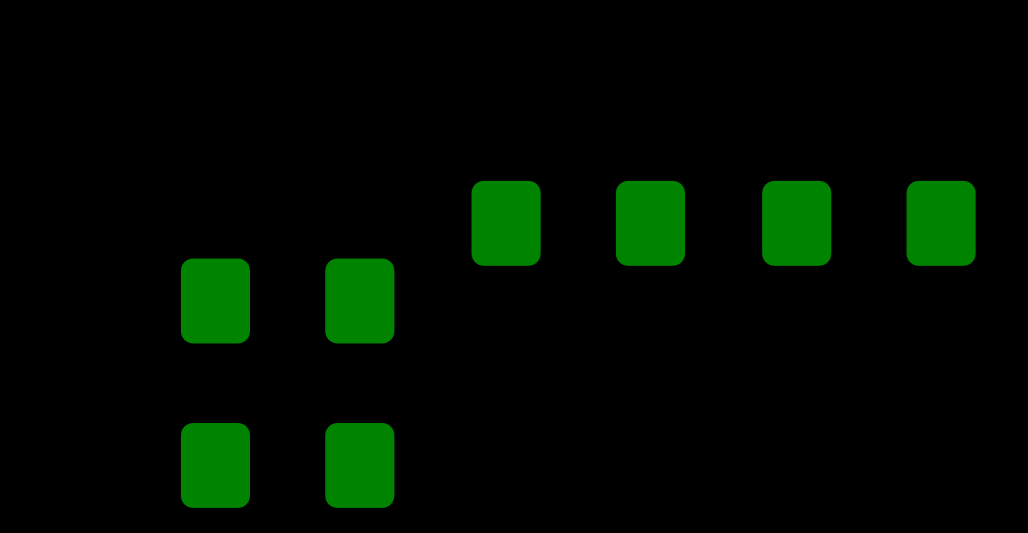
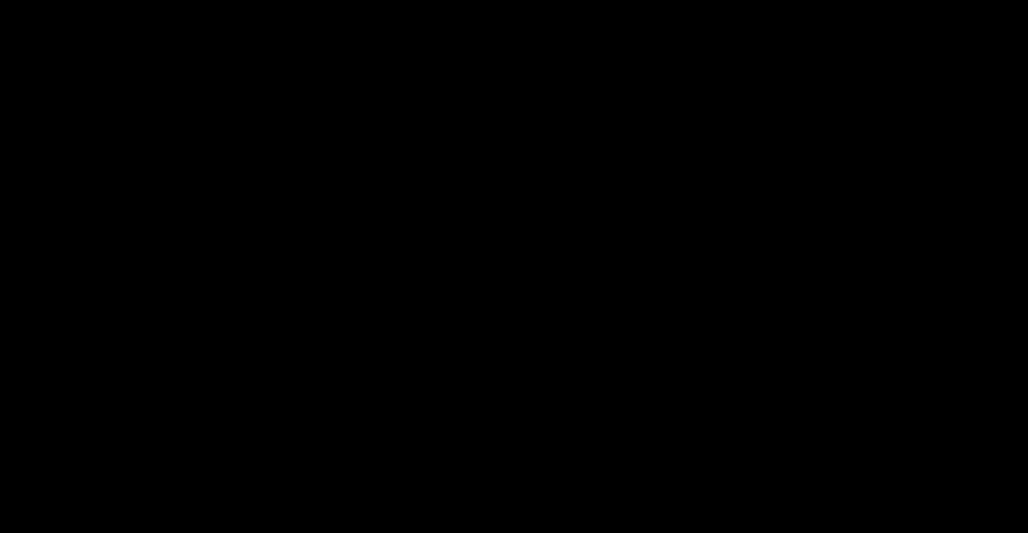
part: (578, 223) -> none
part: (868, 223) -> none
part: (287, 300) -> none
part: (287, 465) -> none

